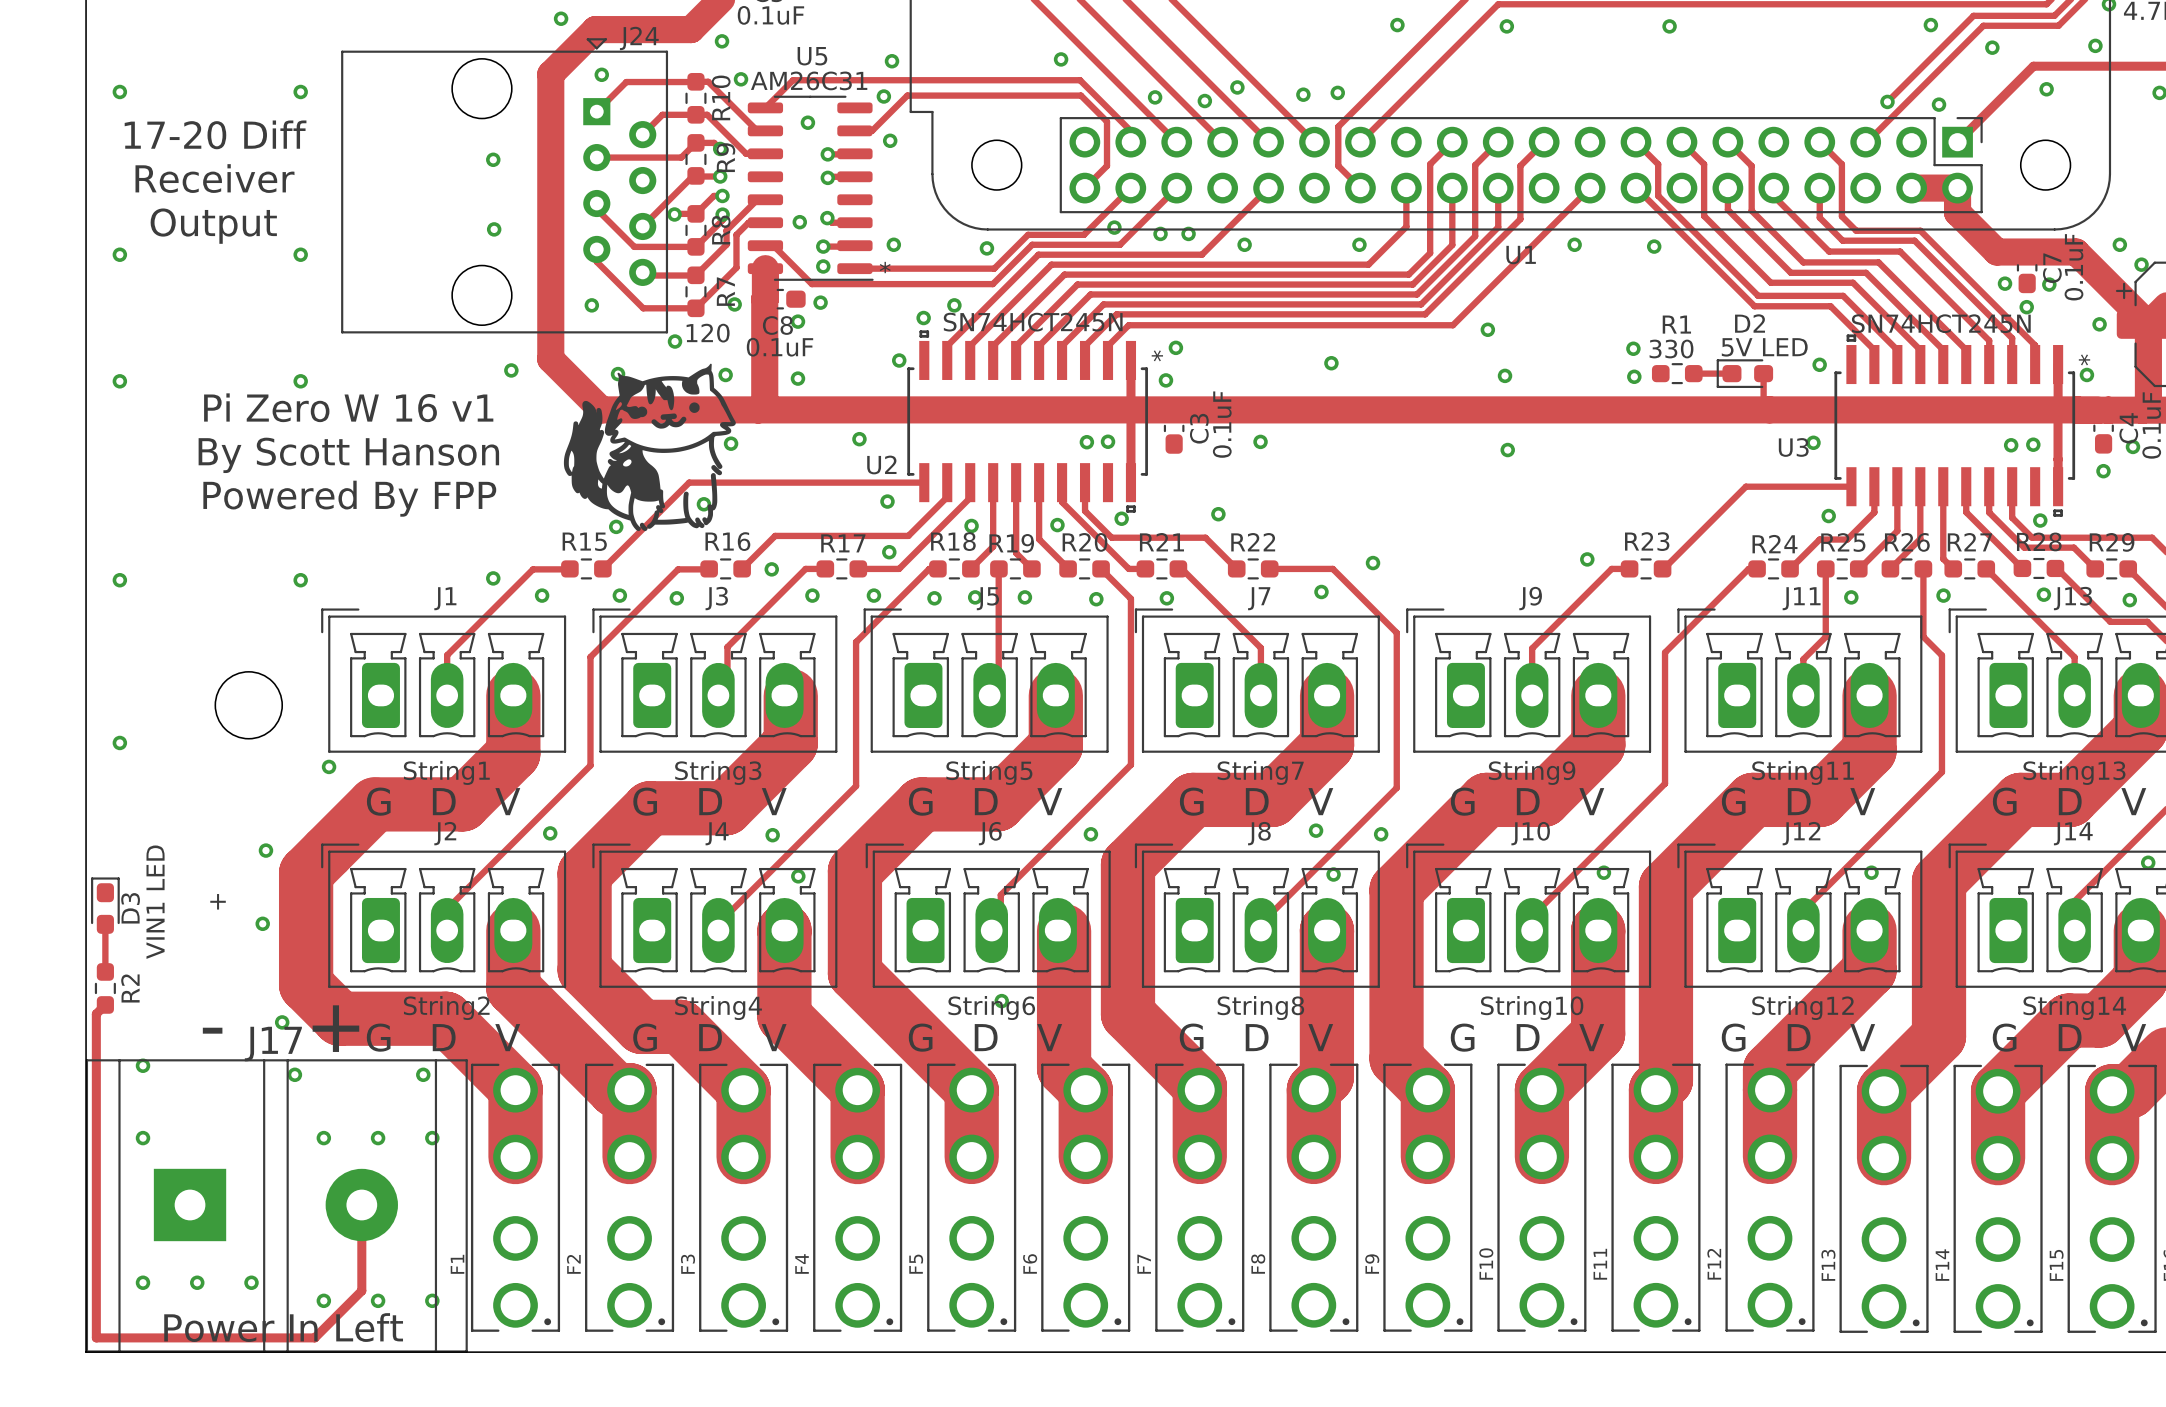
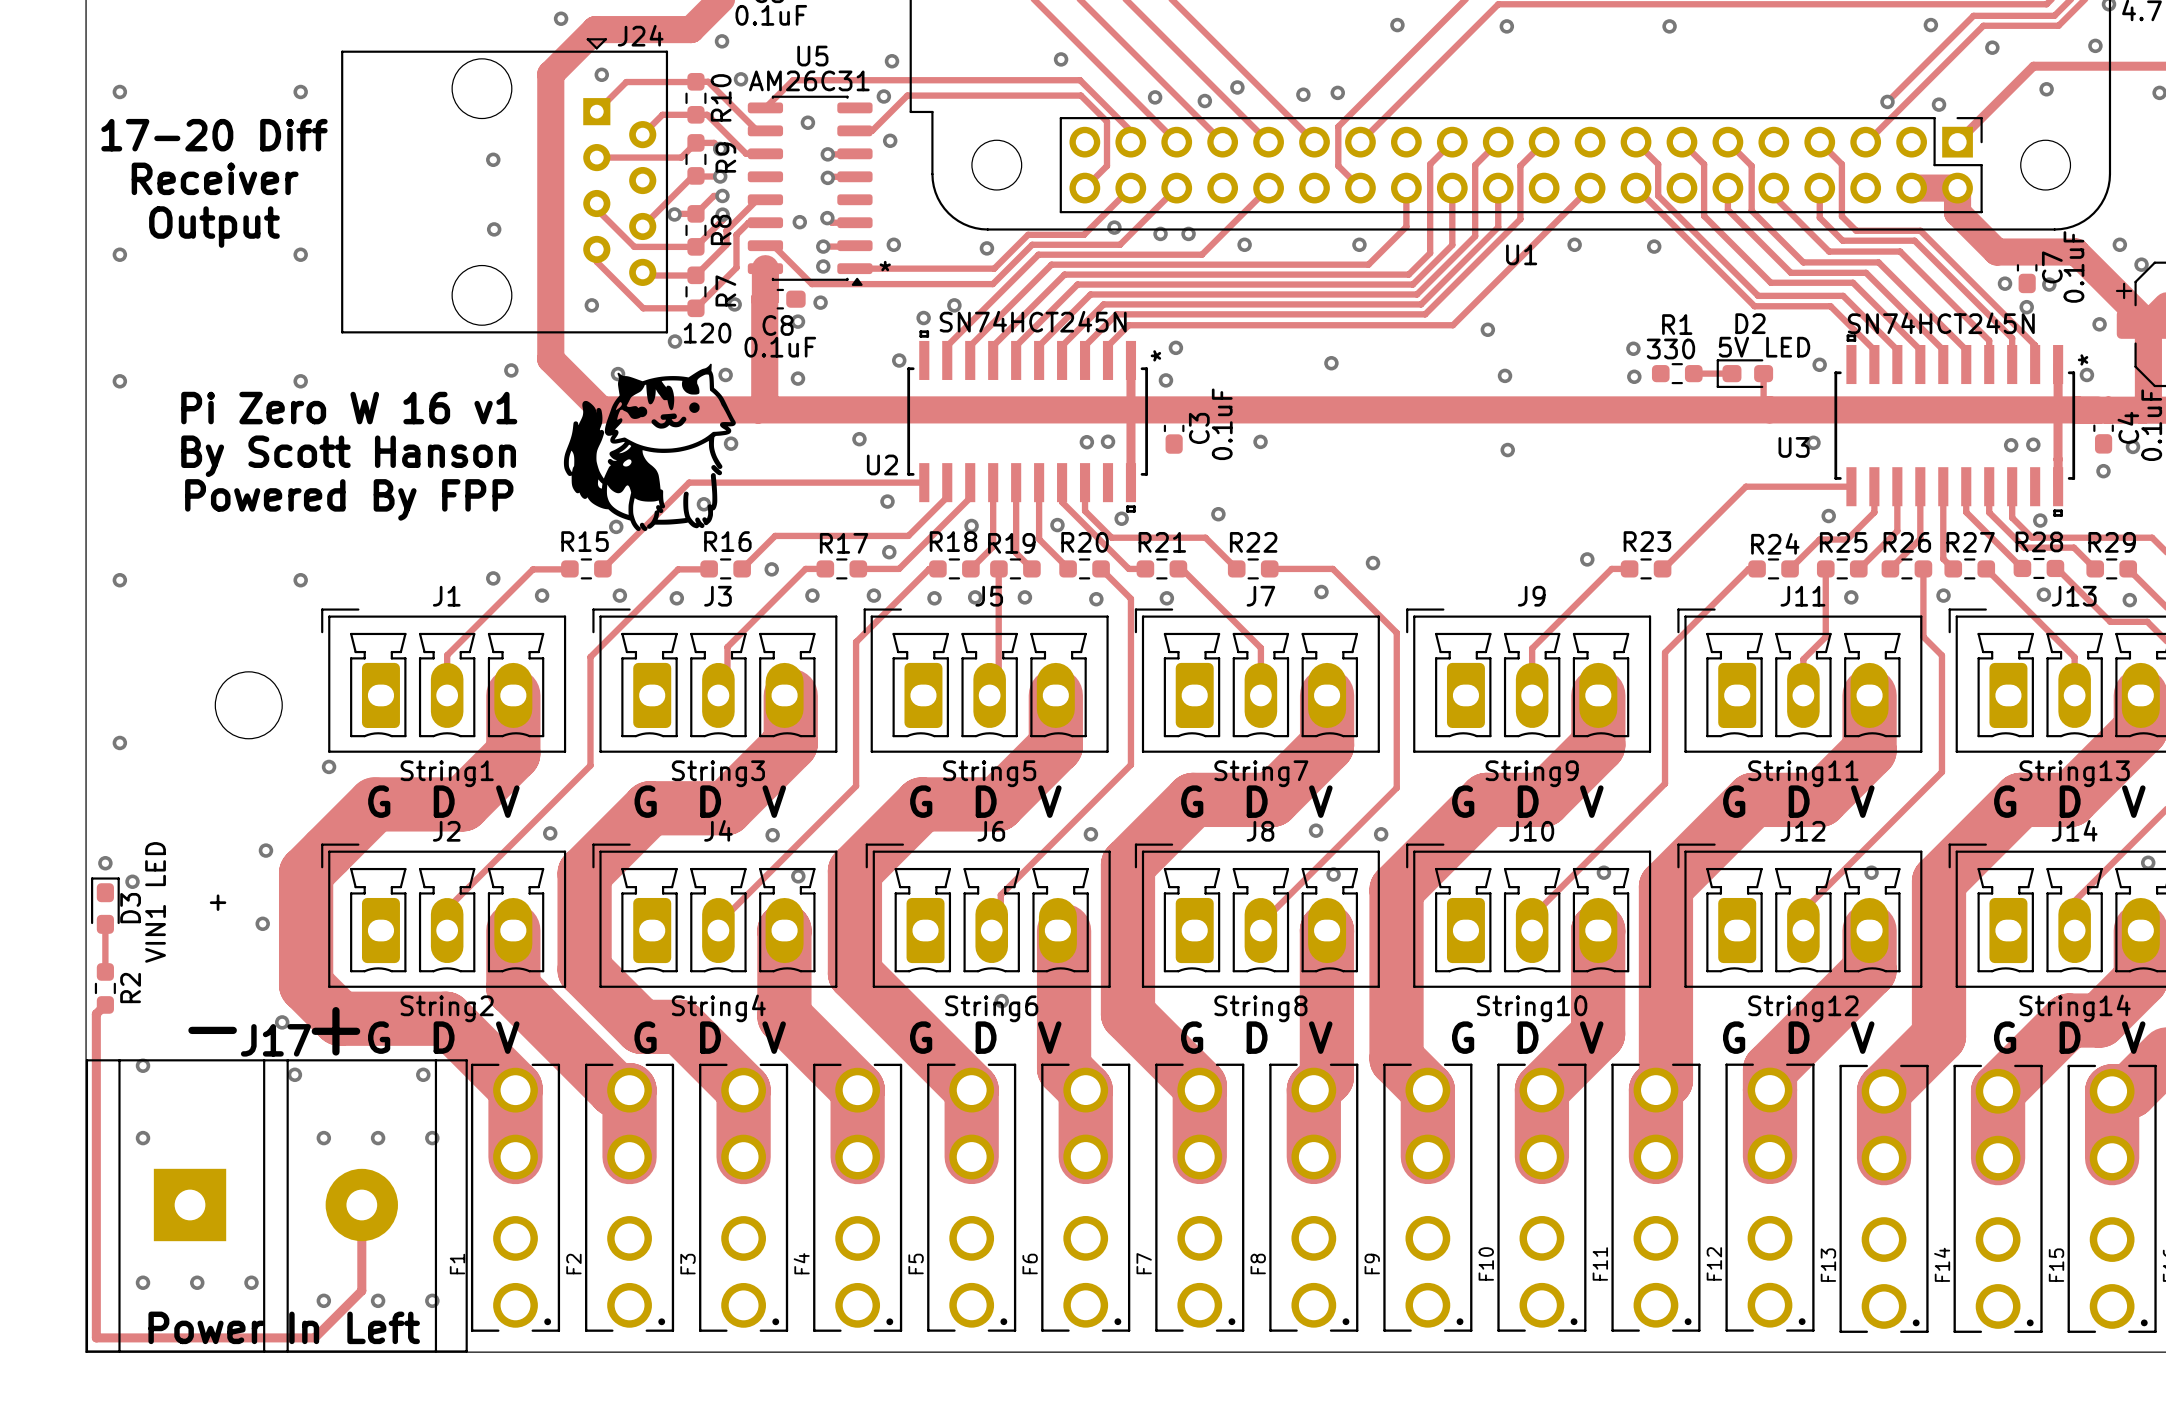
U5 footprint: [747, 95, 874, 281] -> [747, 95, 873, 286]
via: none -> (105, 863)
via: none -> (132, 881)

